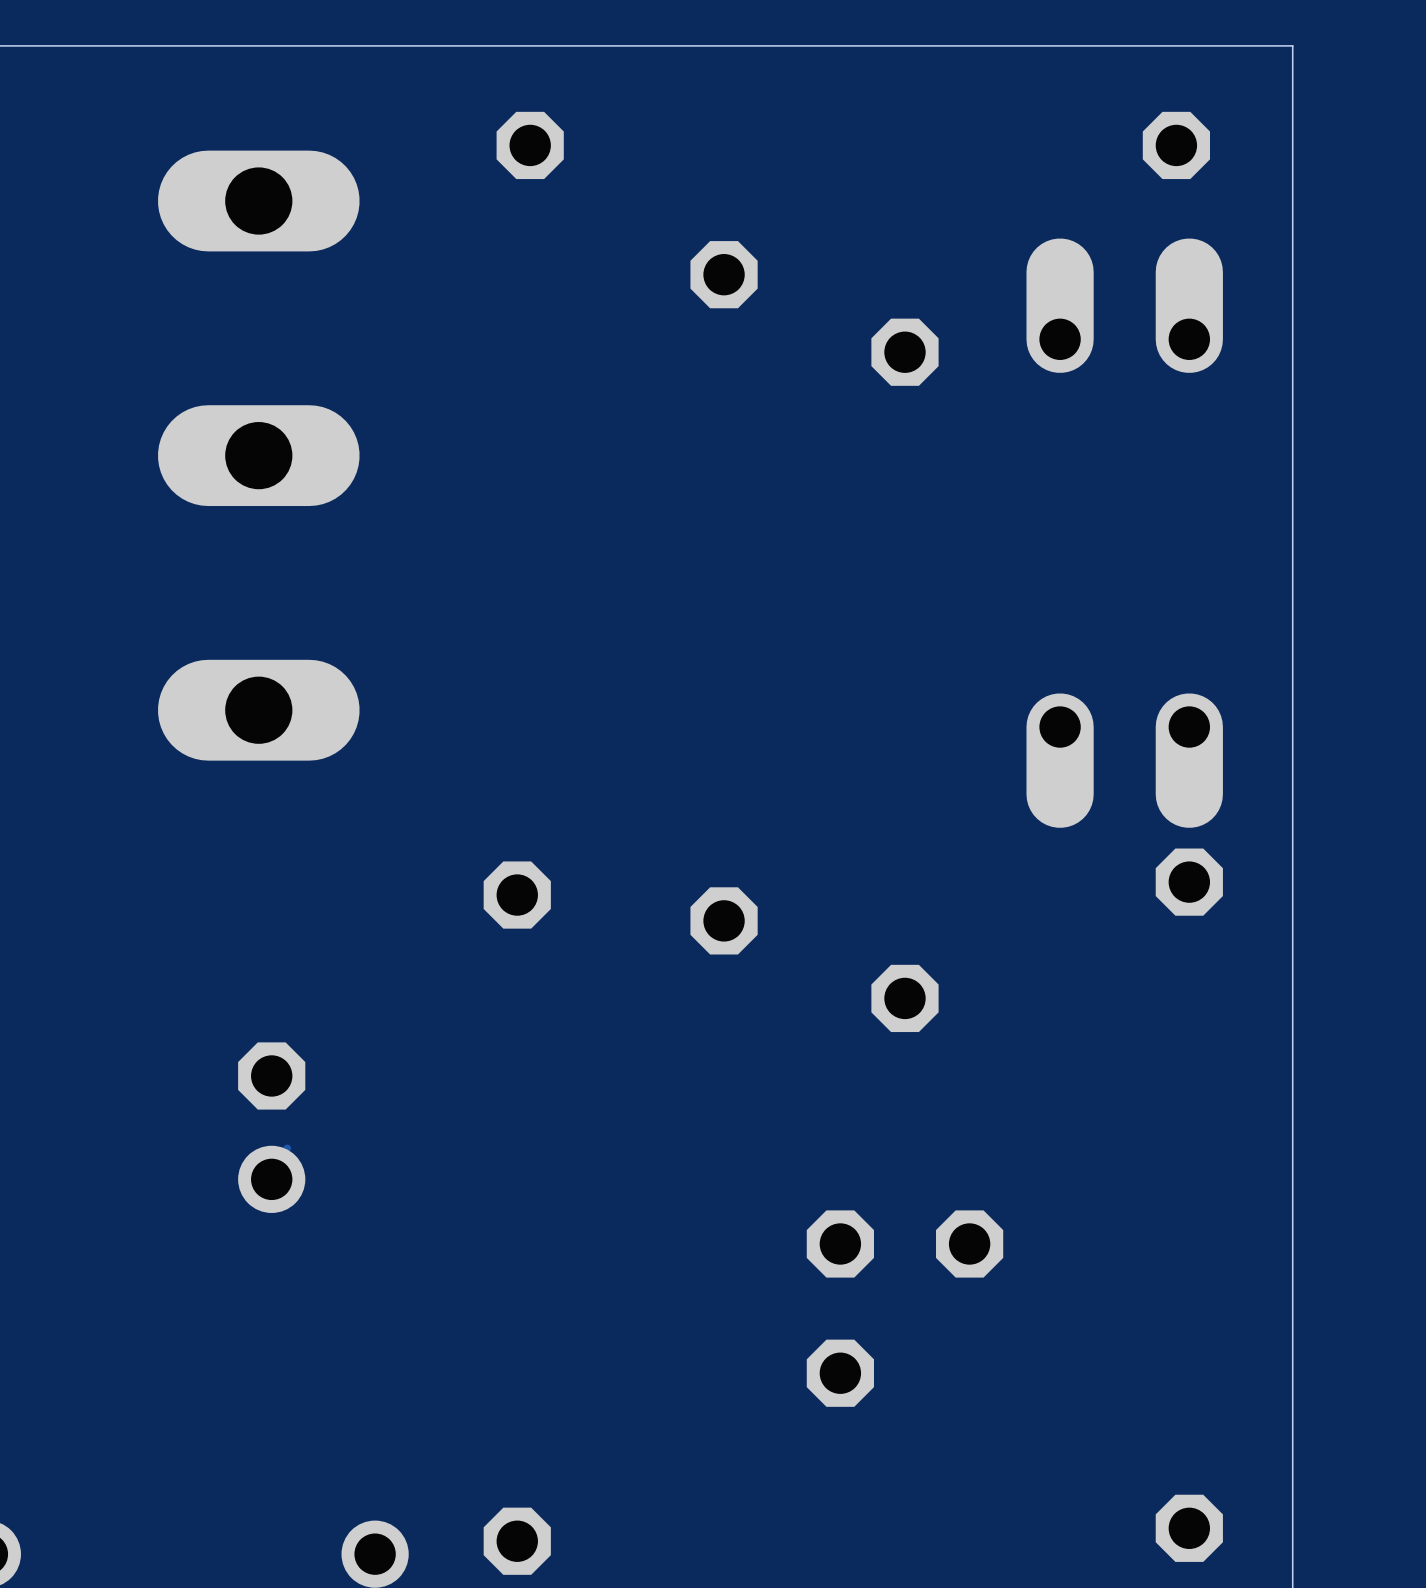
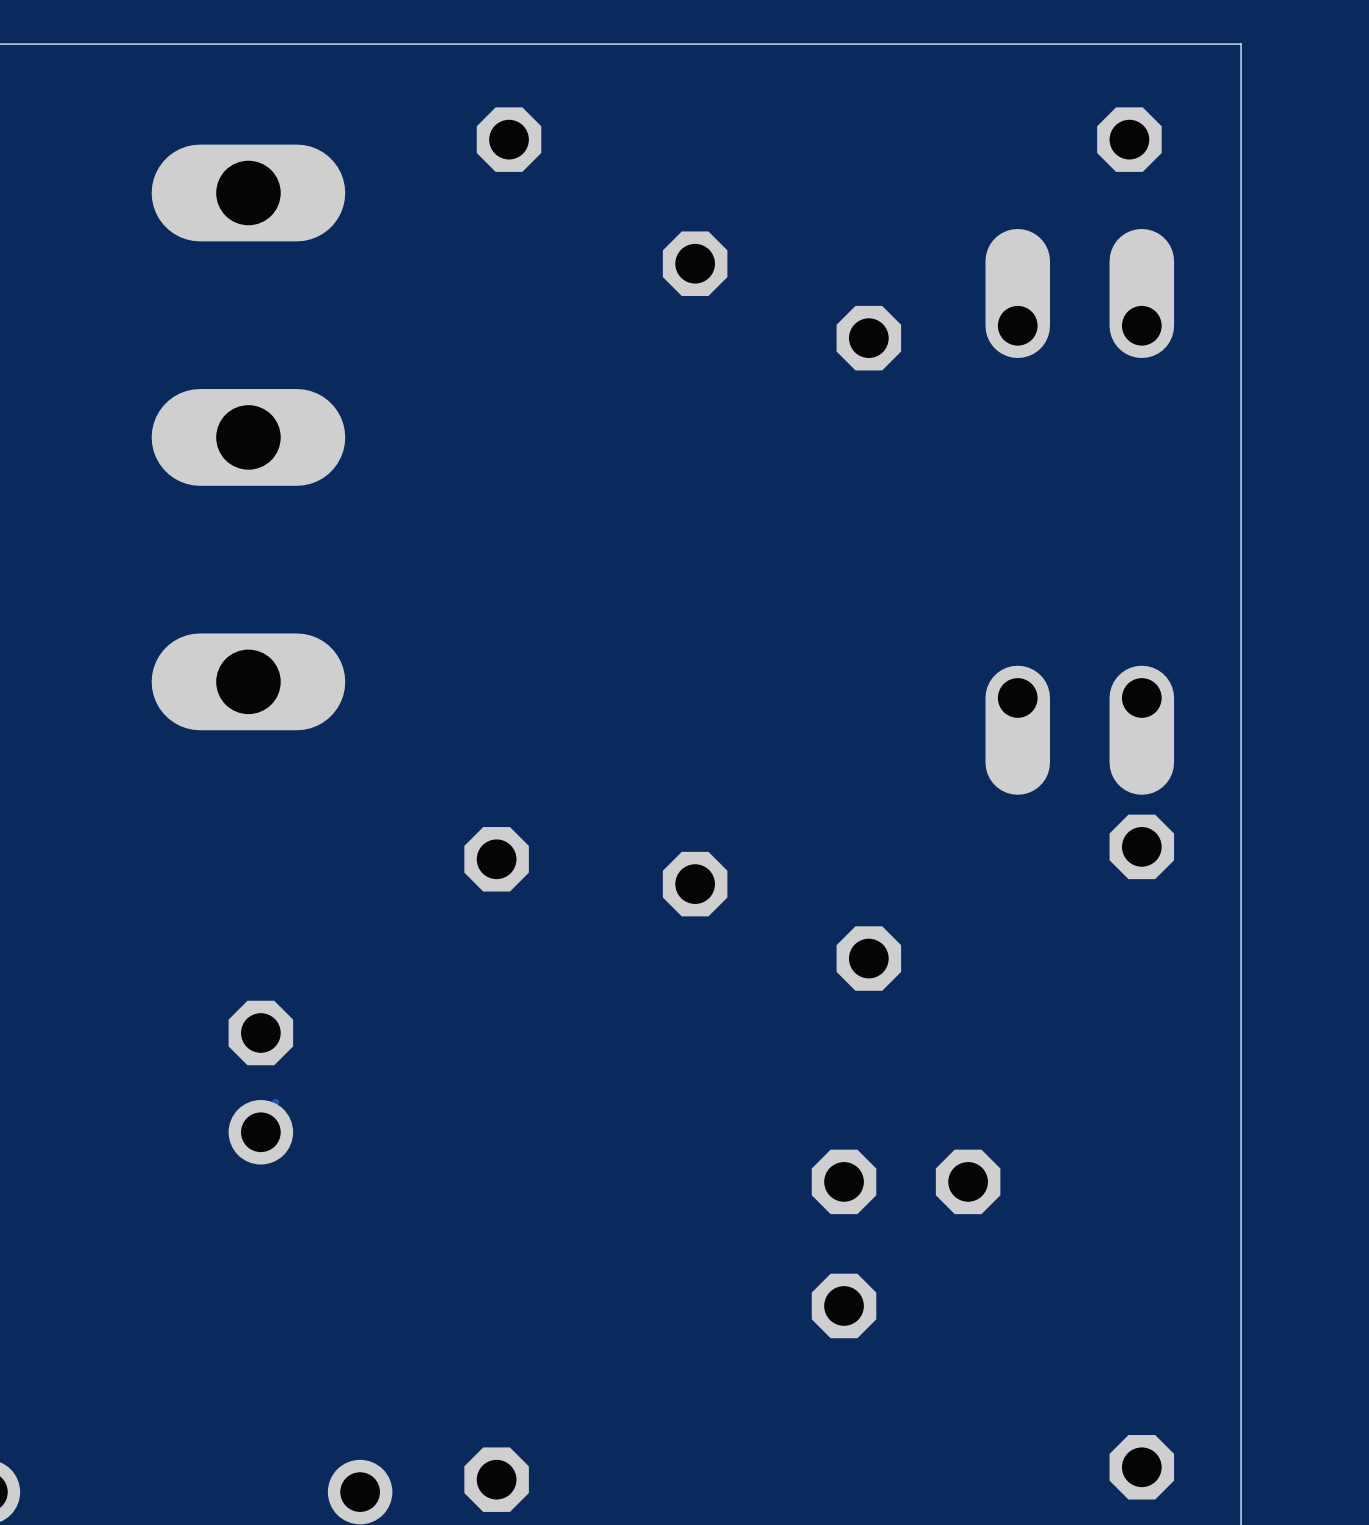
part position: (904, 1308) -> (906, 1243)

